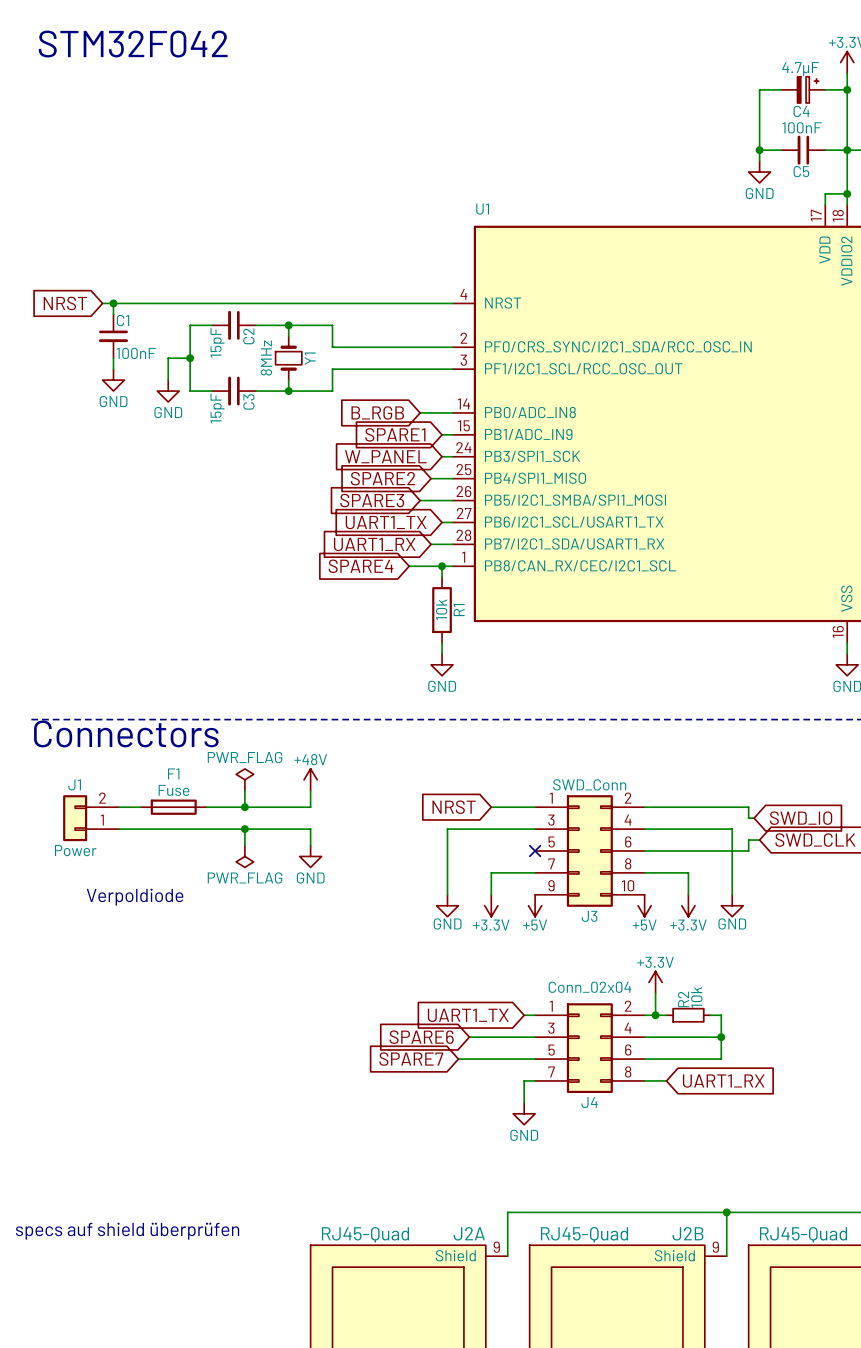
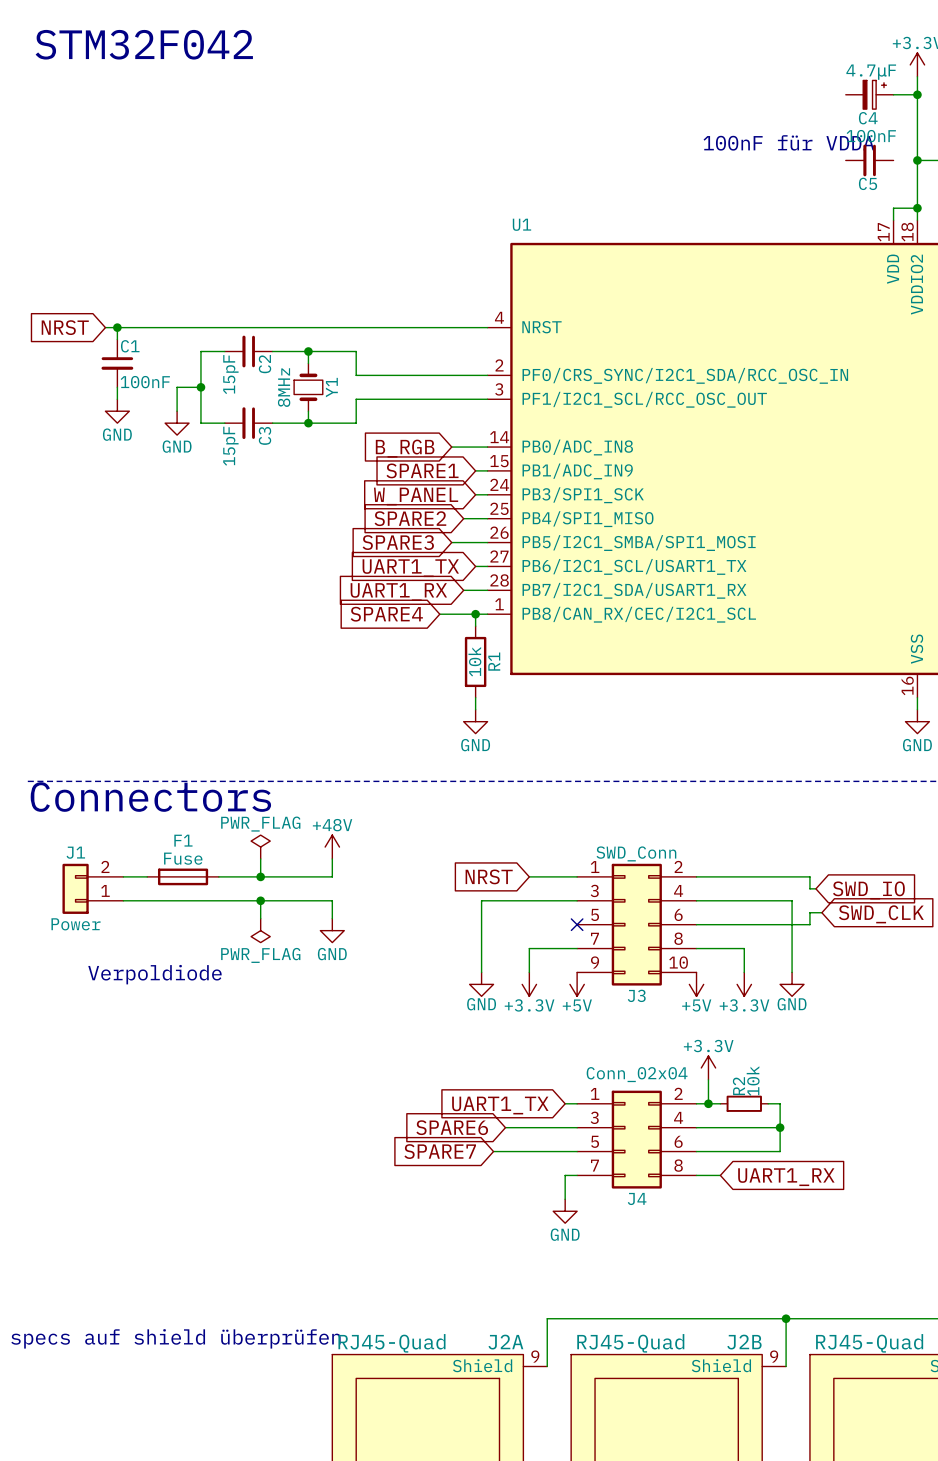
wire: (781, 89) (759, 89) (759, 161) -> none
text: none -> 100nF für VDDA (788, 142)
wire: (759, 150) (781, 150) -> none
junction: (759, 150) -> none
wire: (825, 150) (847, 150) -> none
power symbol: GND (759, 172) -> none

